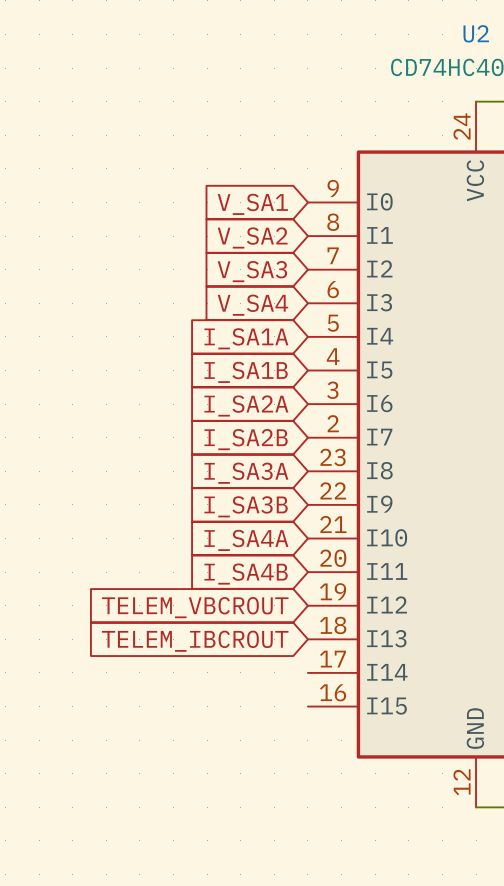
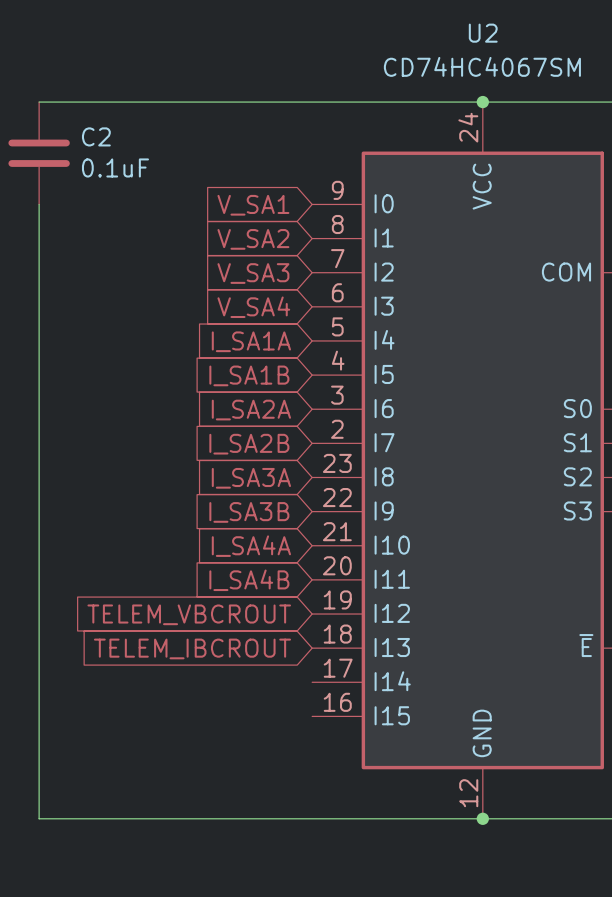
wire: none -> (39, 102) (482, 102)
junction: none -> (482, 102)
C2: none -> 0.1uF (39, 153)
wire: none -> (39, 204) (39, 818) (482, 818)
junction: none -> (482, 818)

